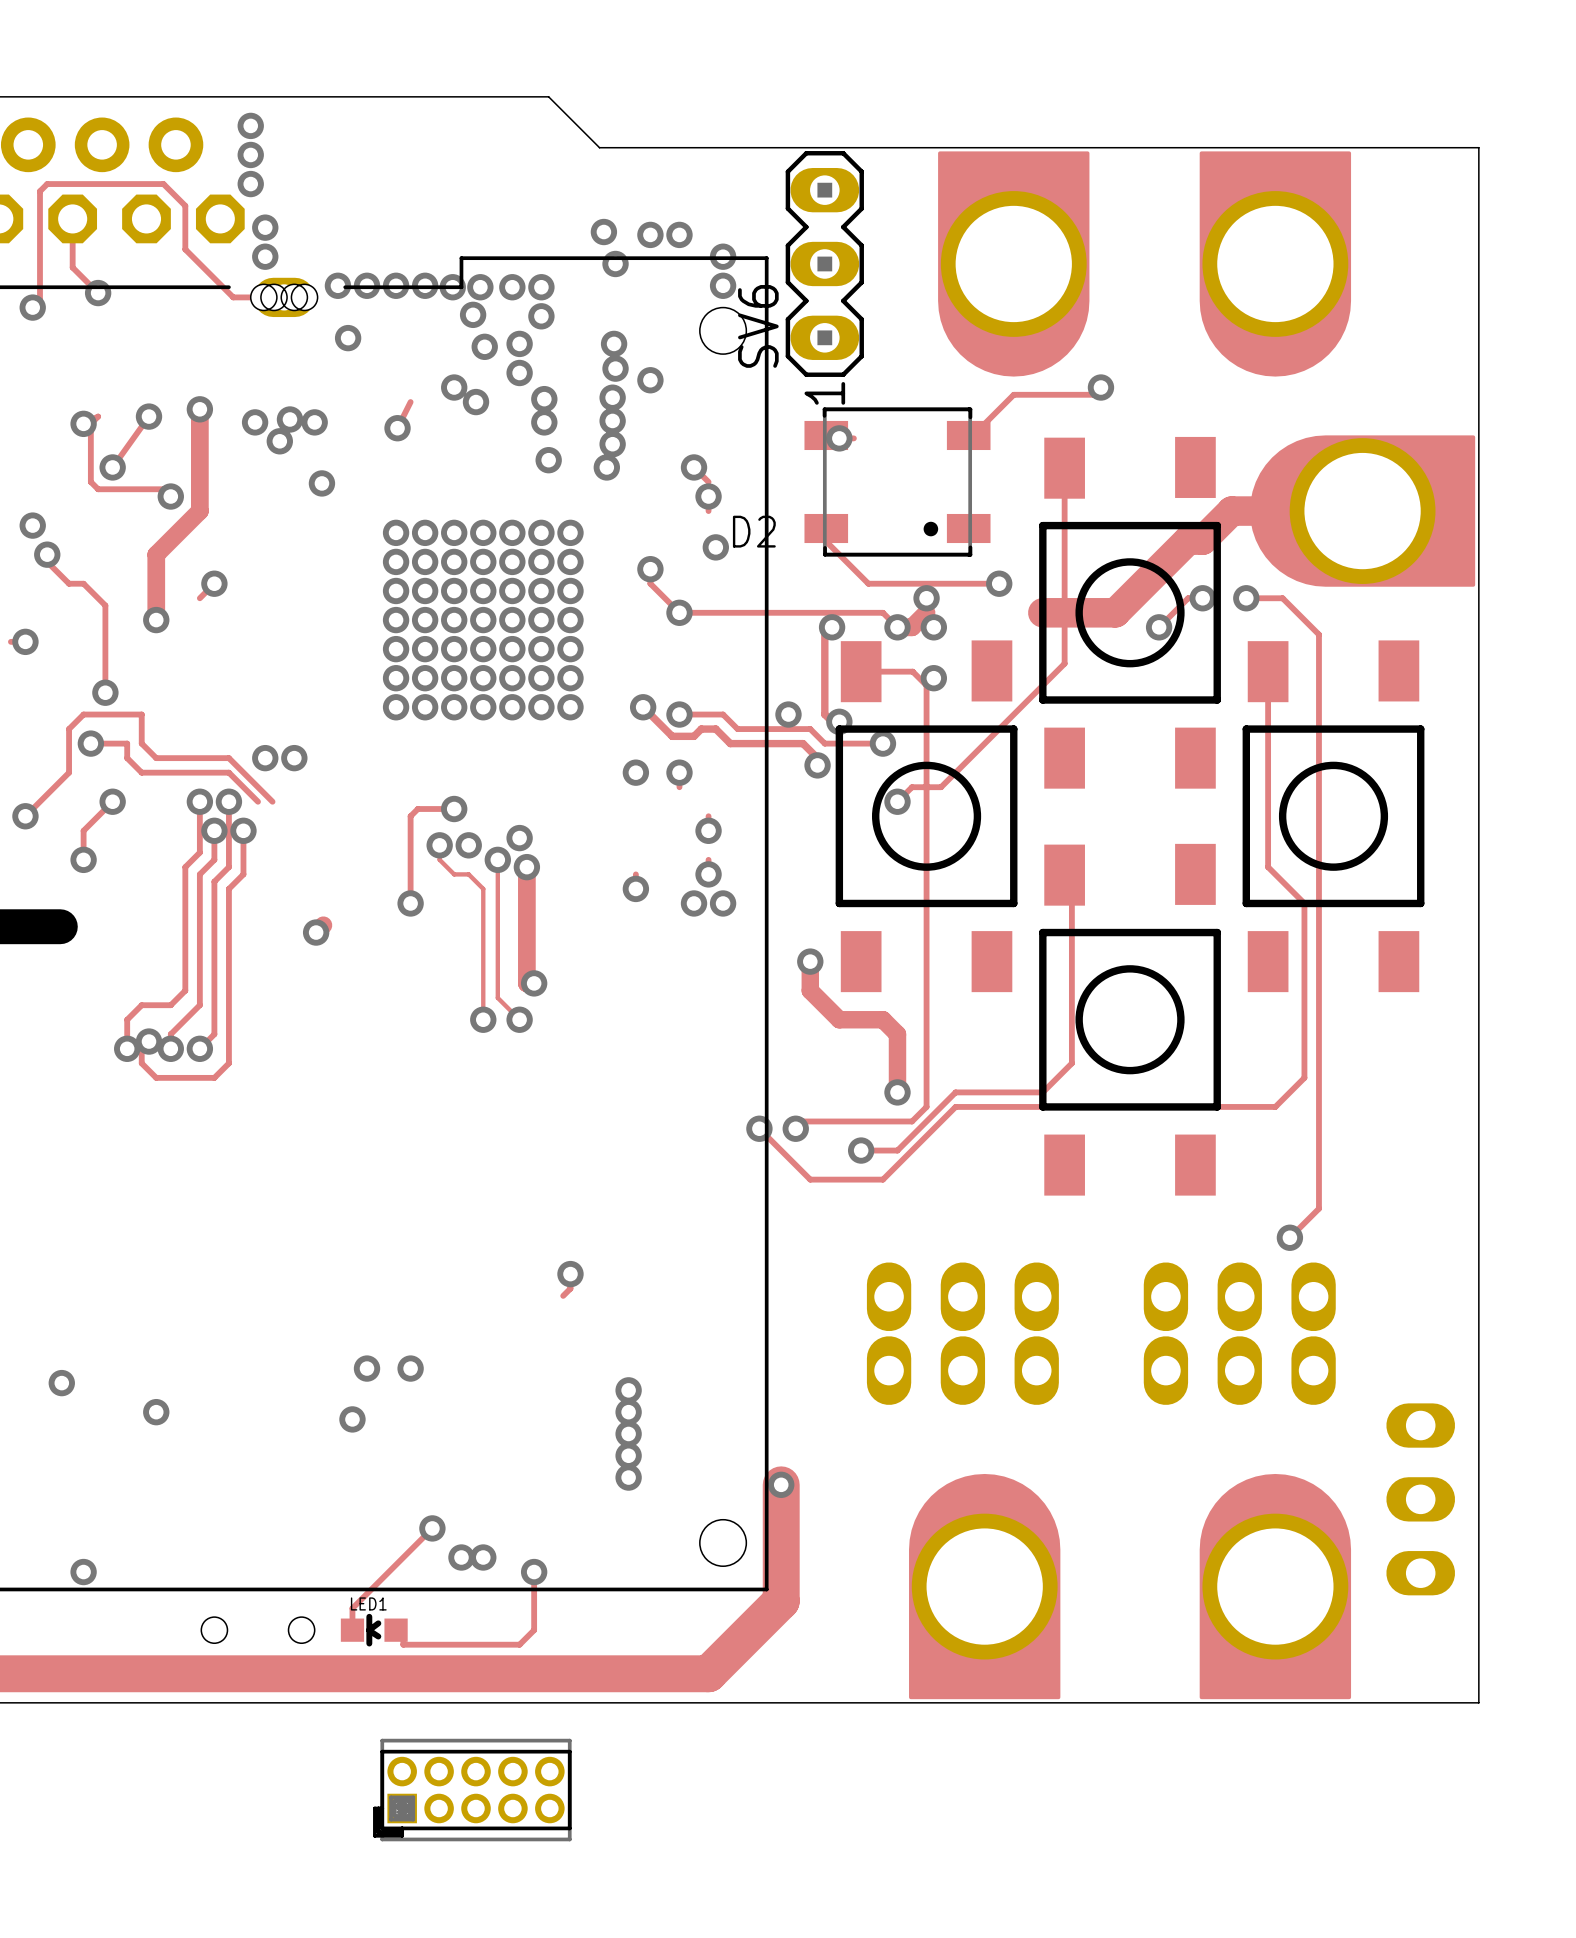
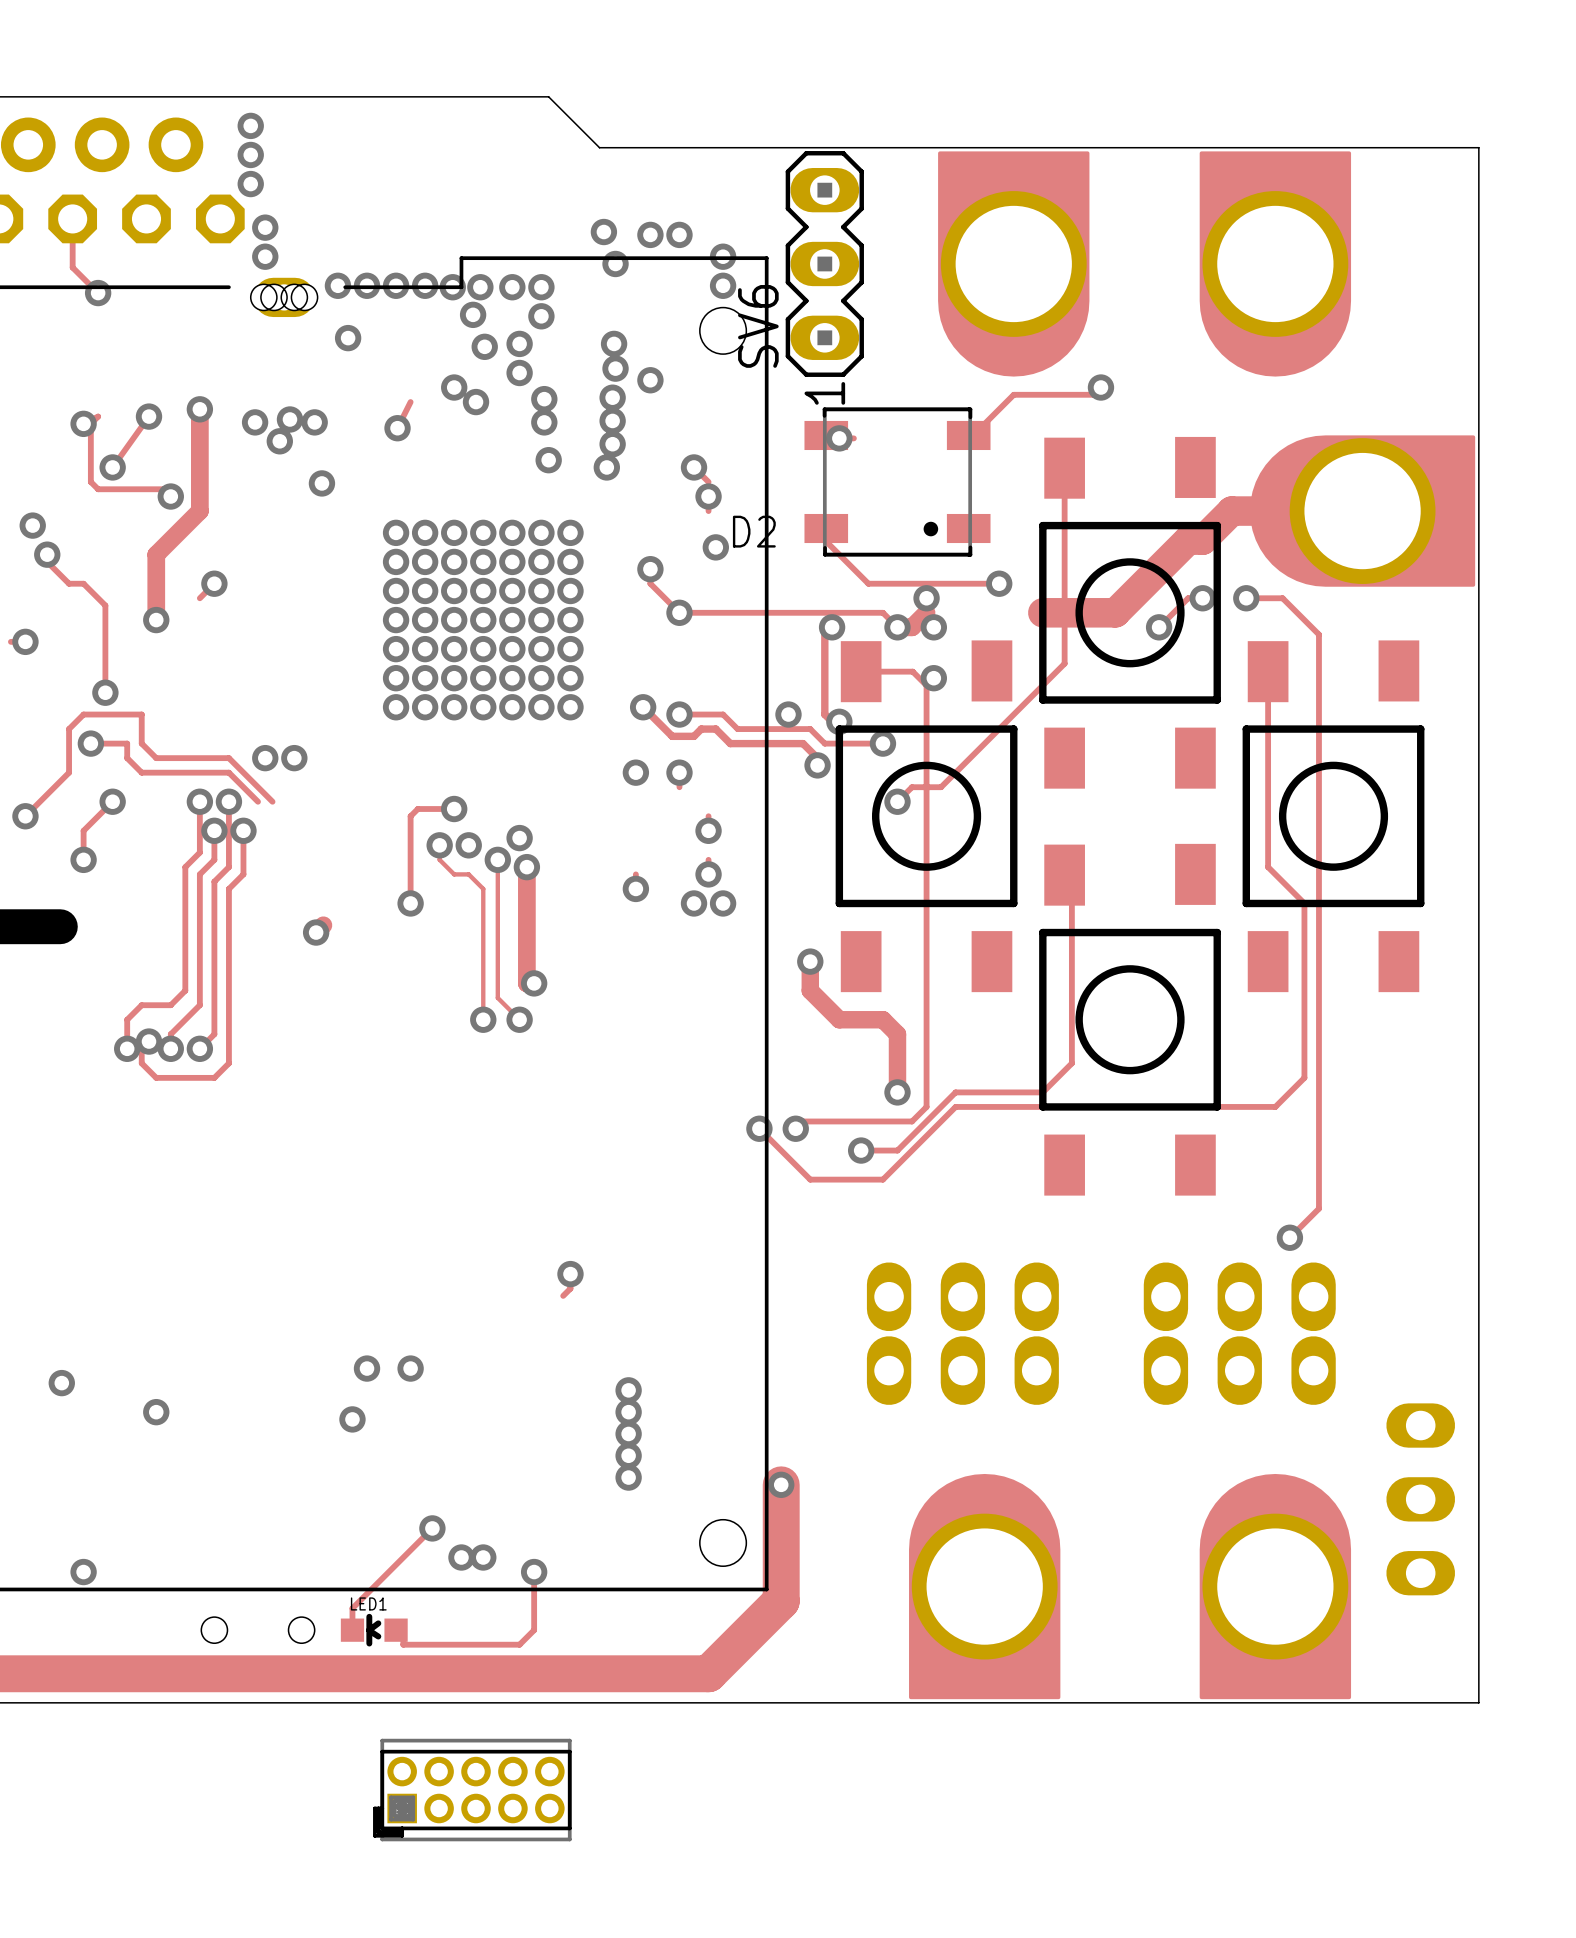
track: (284, 297) (233, 297) (185, 249) (185, 205) (163, 184) (47, 184) (39, 191) (39, 300) (32, 307) -> none
via: (32, 307) -> none

